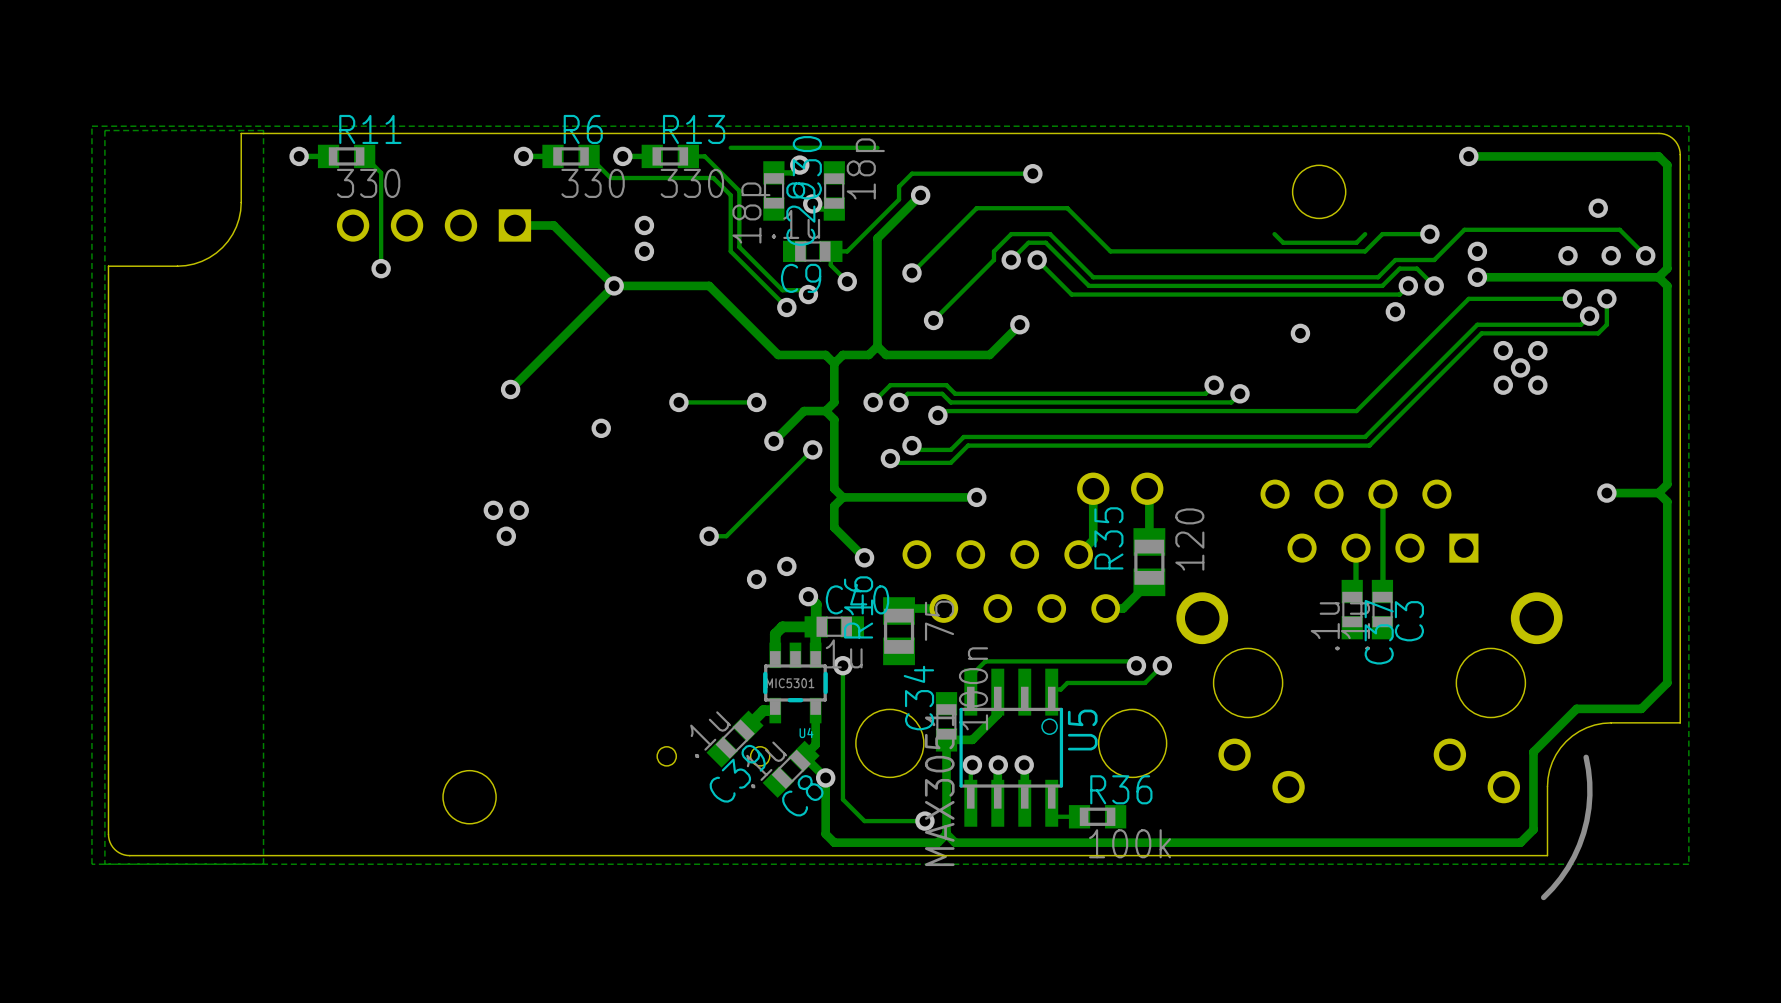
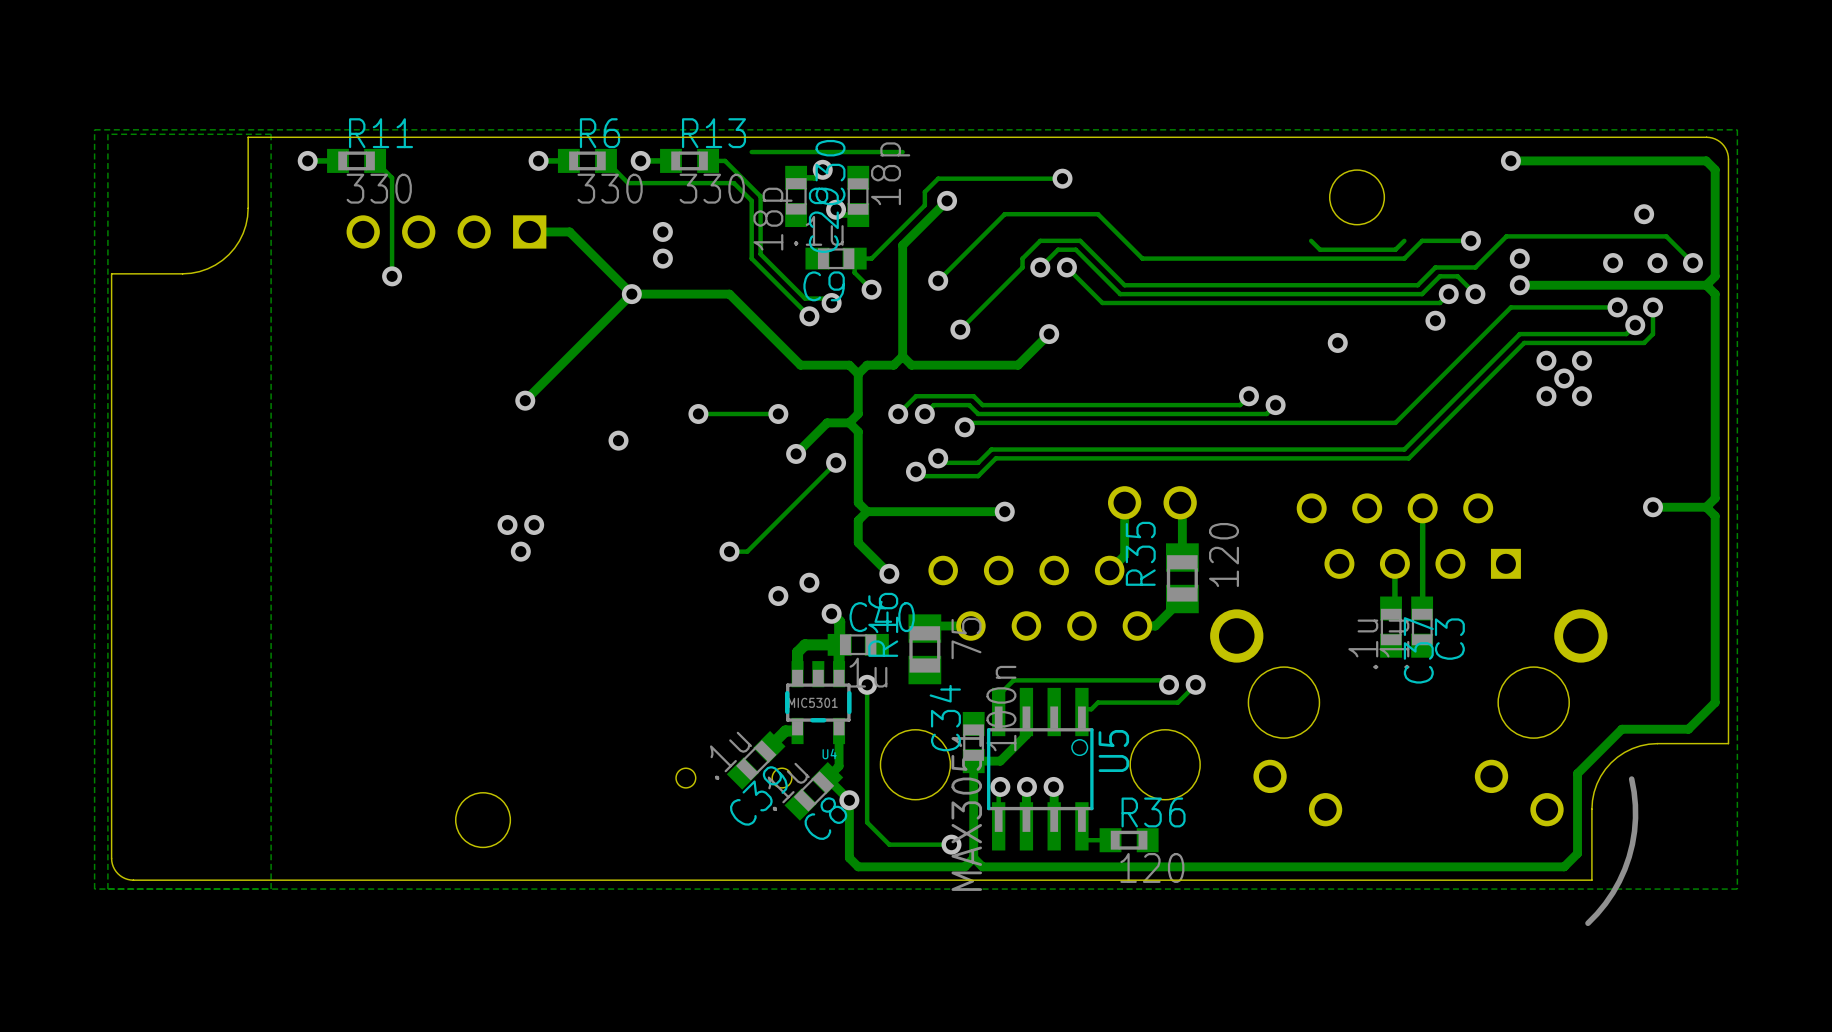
R36 value: 100k (1130, 843) -> 120 (1152, 867)

